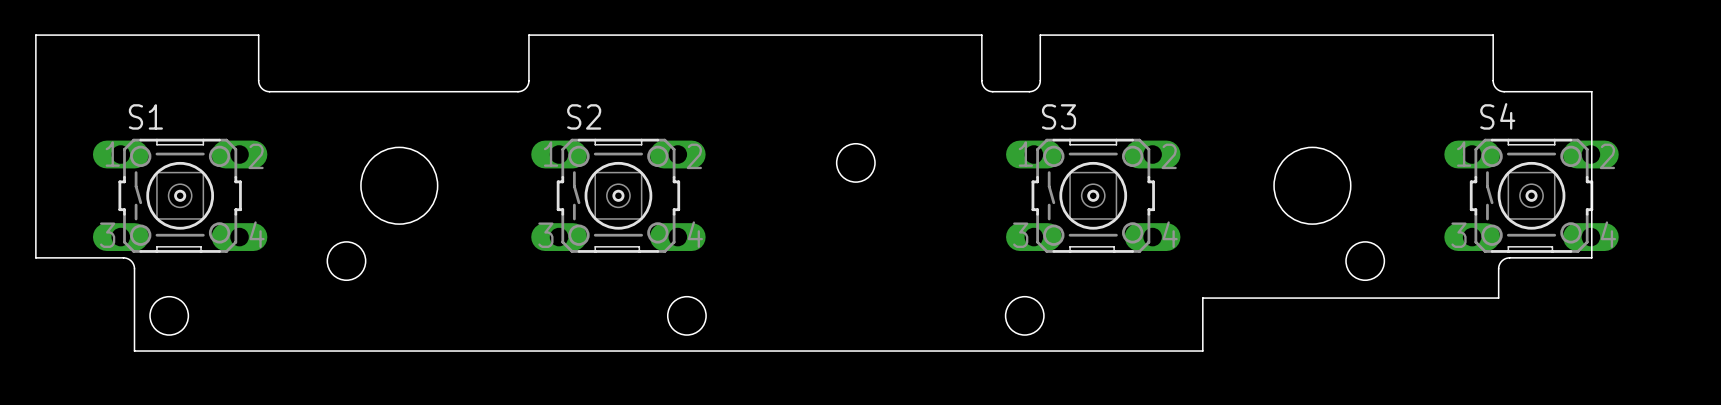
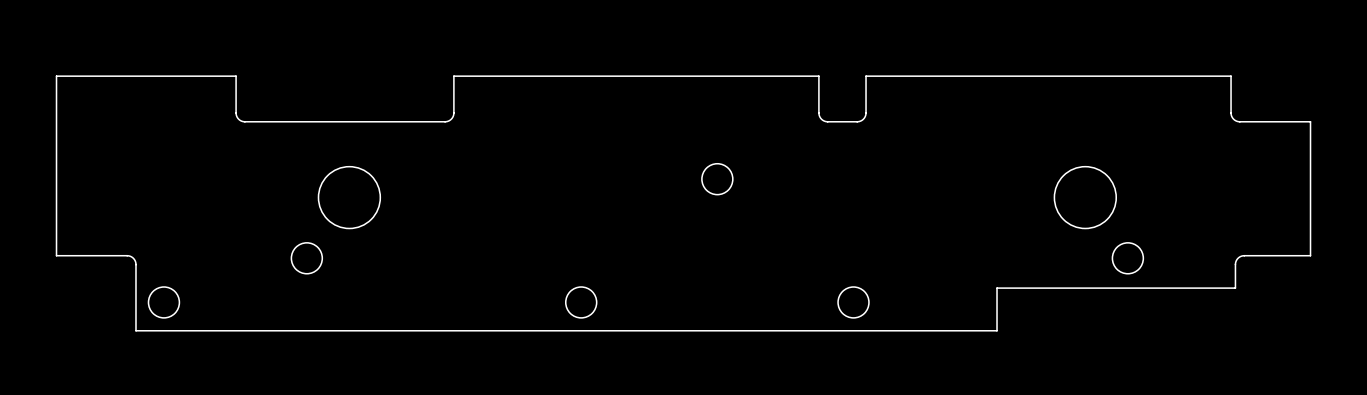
S1: (180, 195) -> none
S2: (618, 195) -> none
S3: (1093, 195) -> none
S4: (1531, 195) -> none

